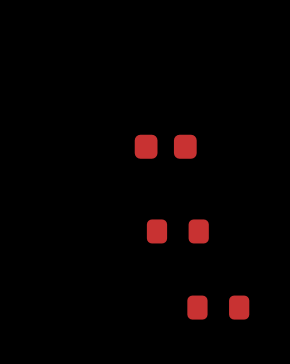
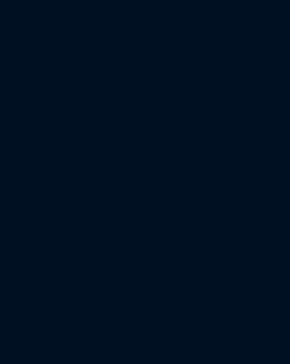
part: (165, 146) -> none
part: (177, 231) -> none
part: (218, 307) -> none

